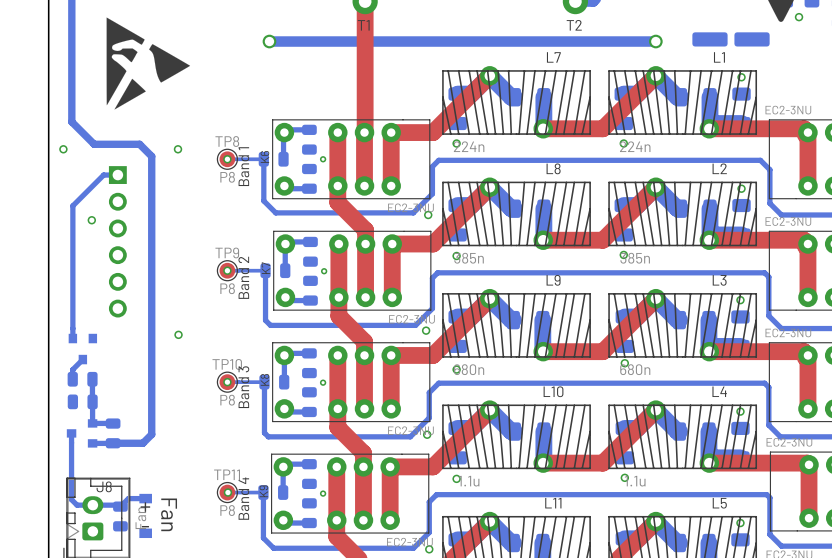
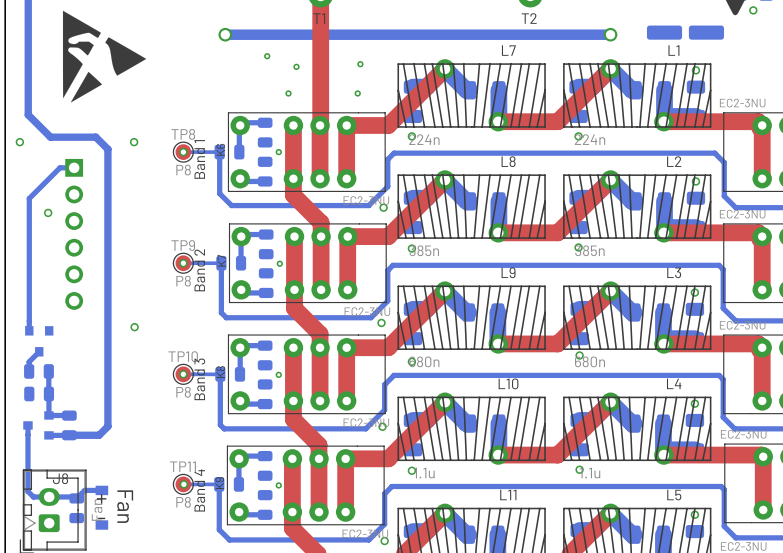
via: none -> (267, 56)
via: none -> (360, 64)
via: none -> (296, 66)
via: none -> (288, 93)
via: none -> (357, 93)

